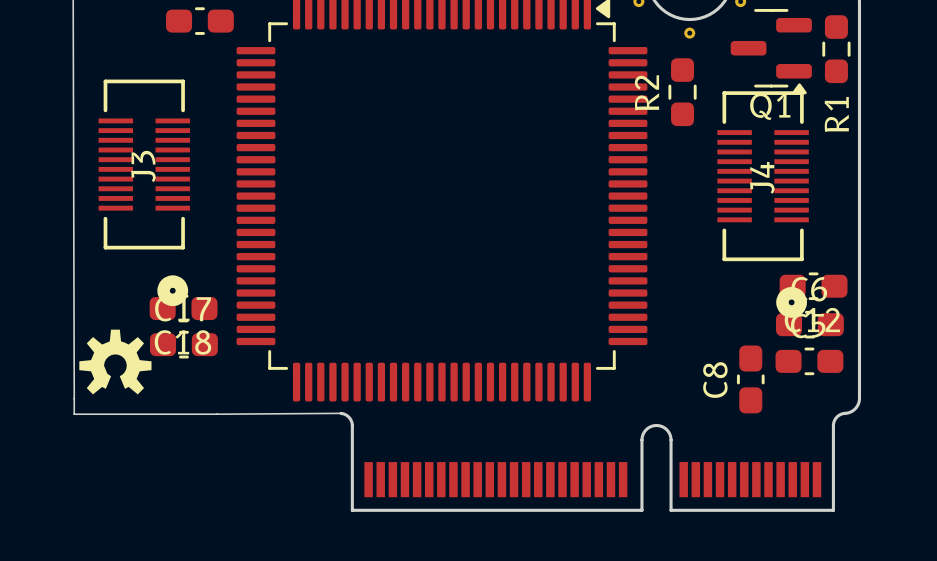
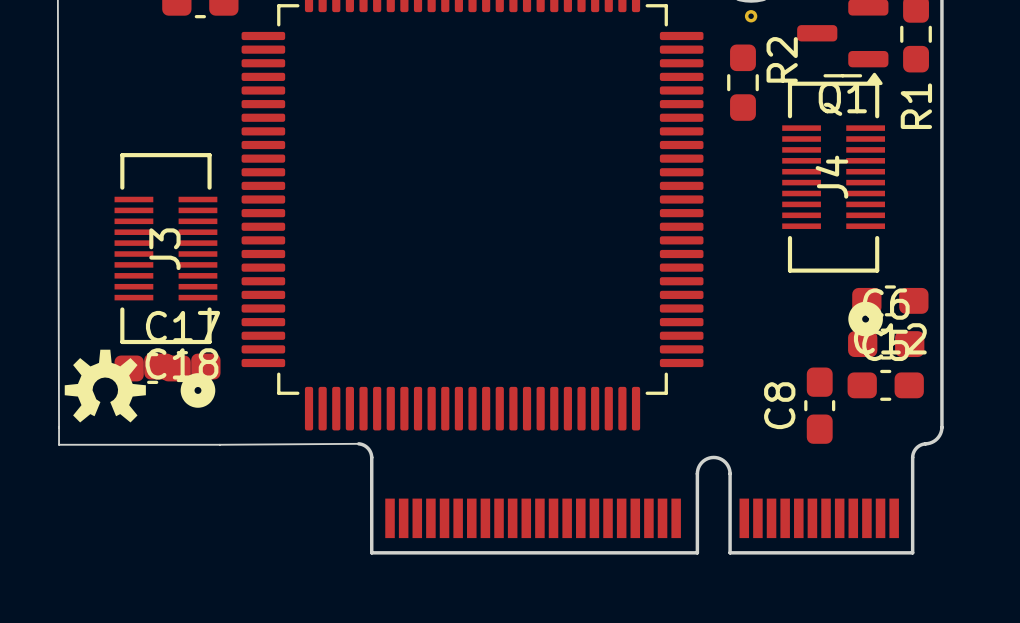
R2 name position: R2 (646, 92) -> R2 (782, 59)
J3 position: (144, 192) -> (165, 280)
C18 position: (183, 308) -> (152, 368)

